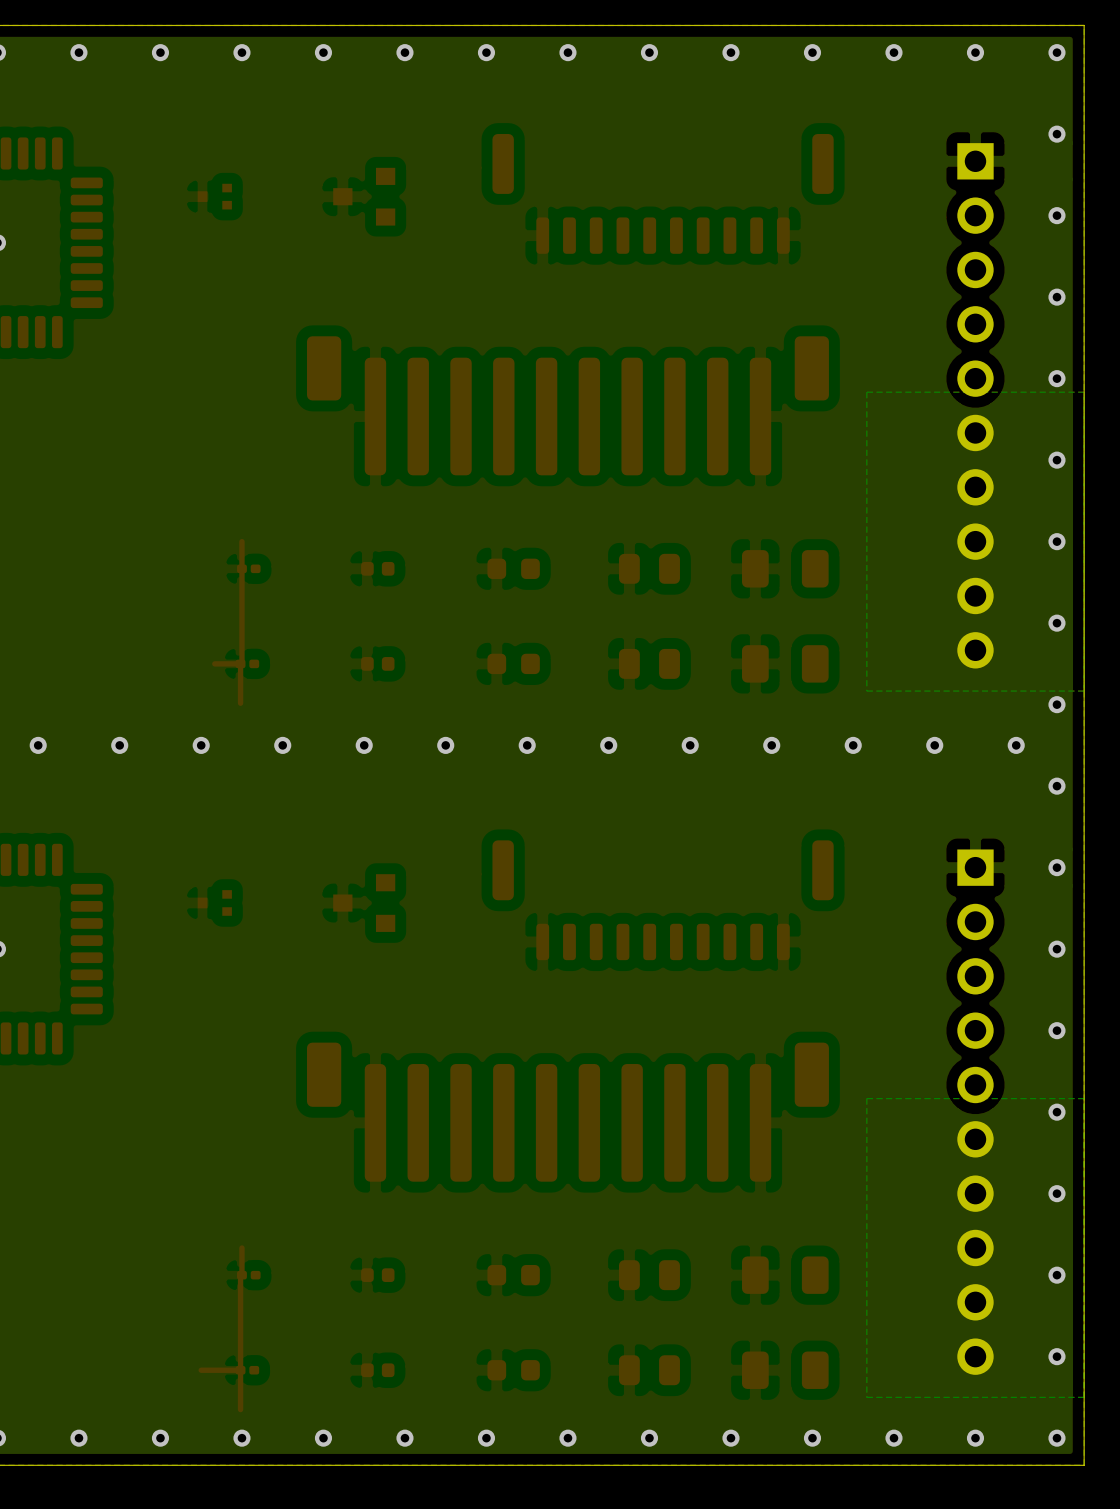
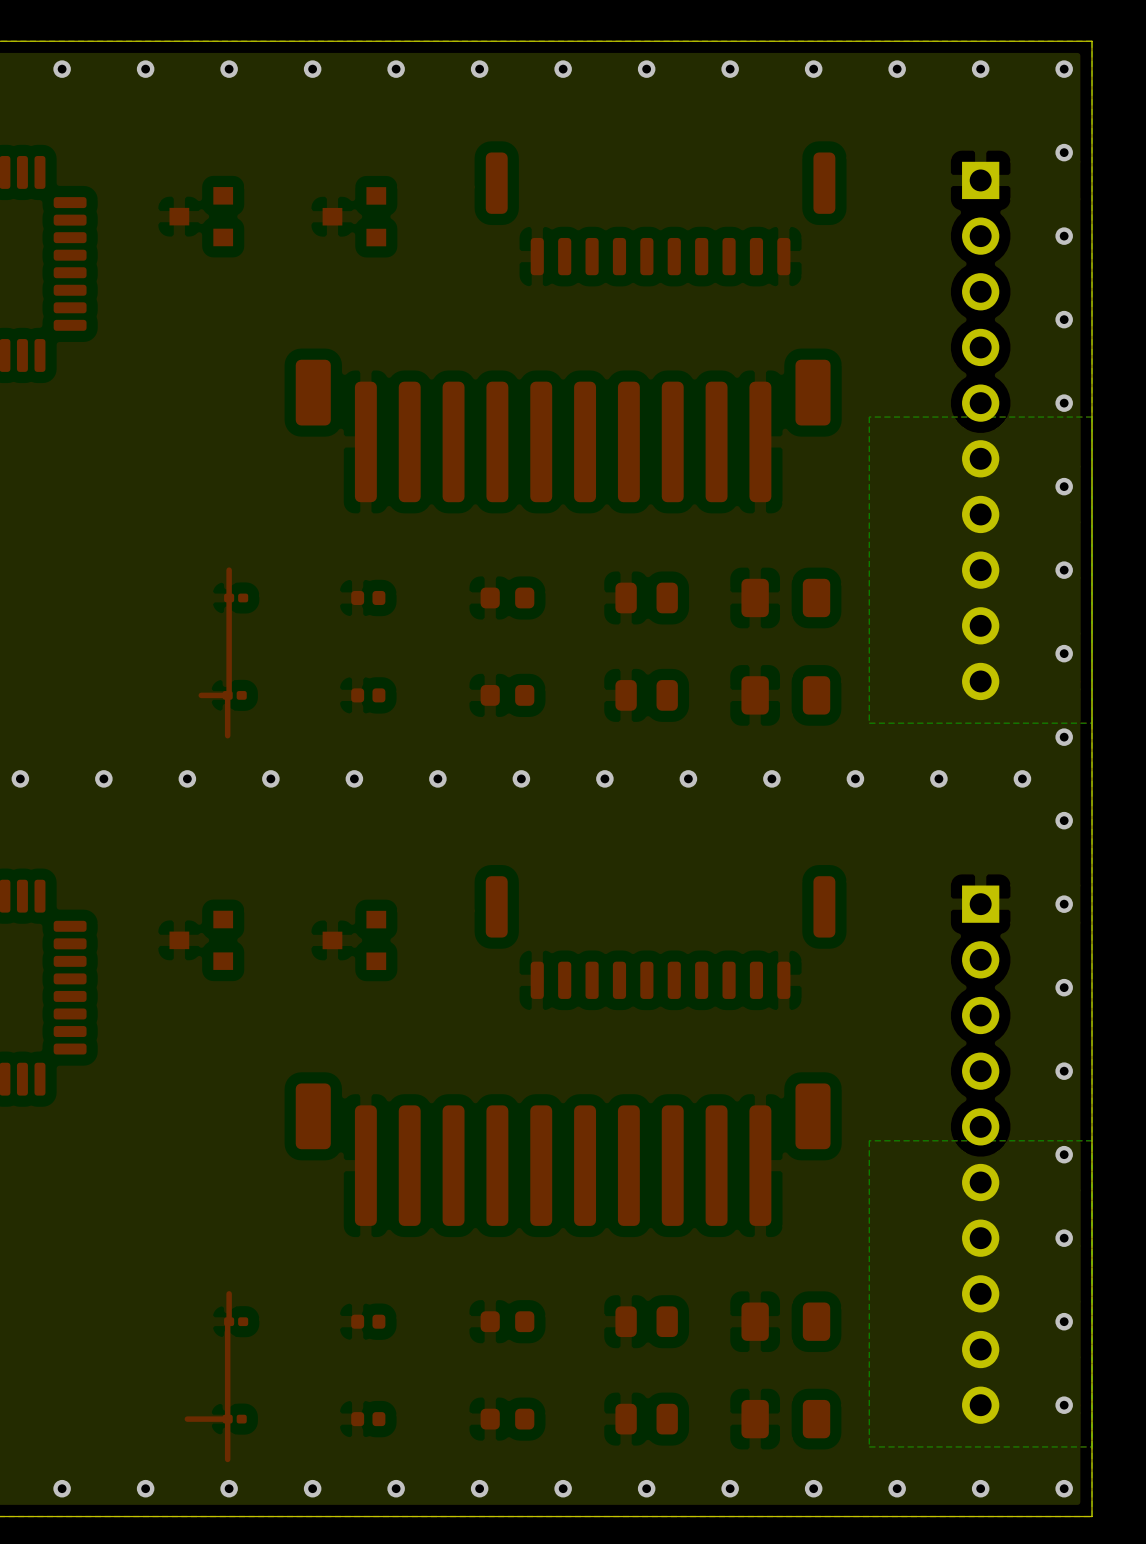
part footprint: [197, 183, 232, 210] -> [169, 187, 234, 247]
part footprint: [197, 890, 232, 916] -> [169, 910, 234, 970]

